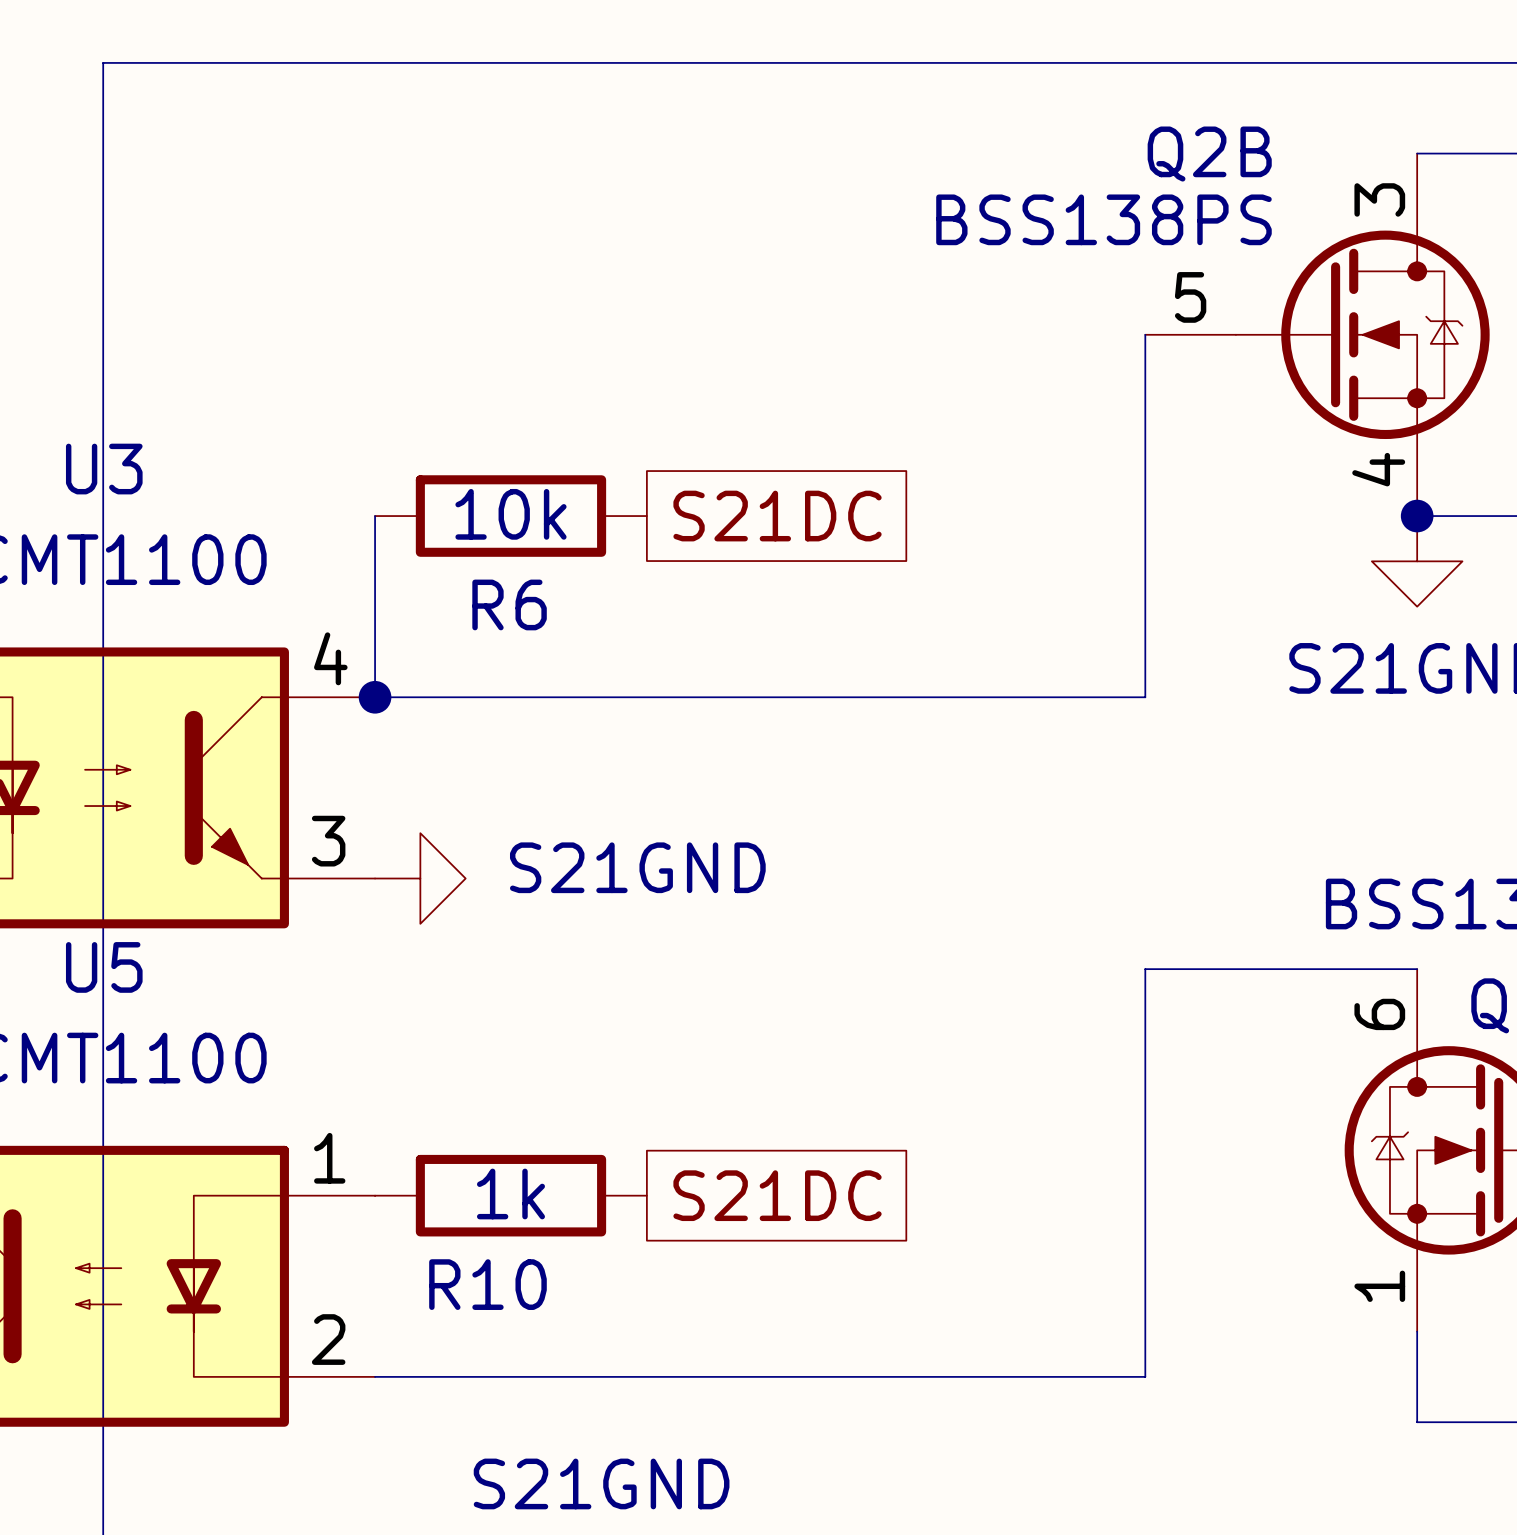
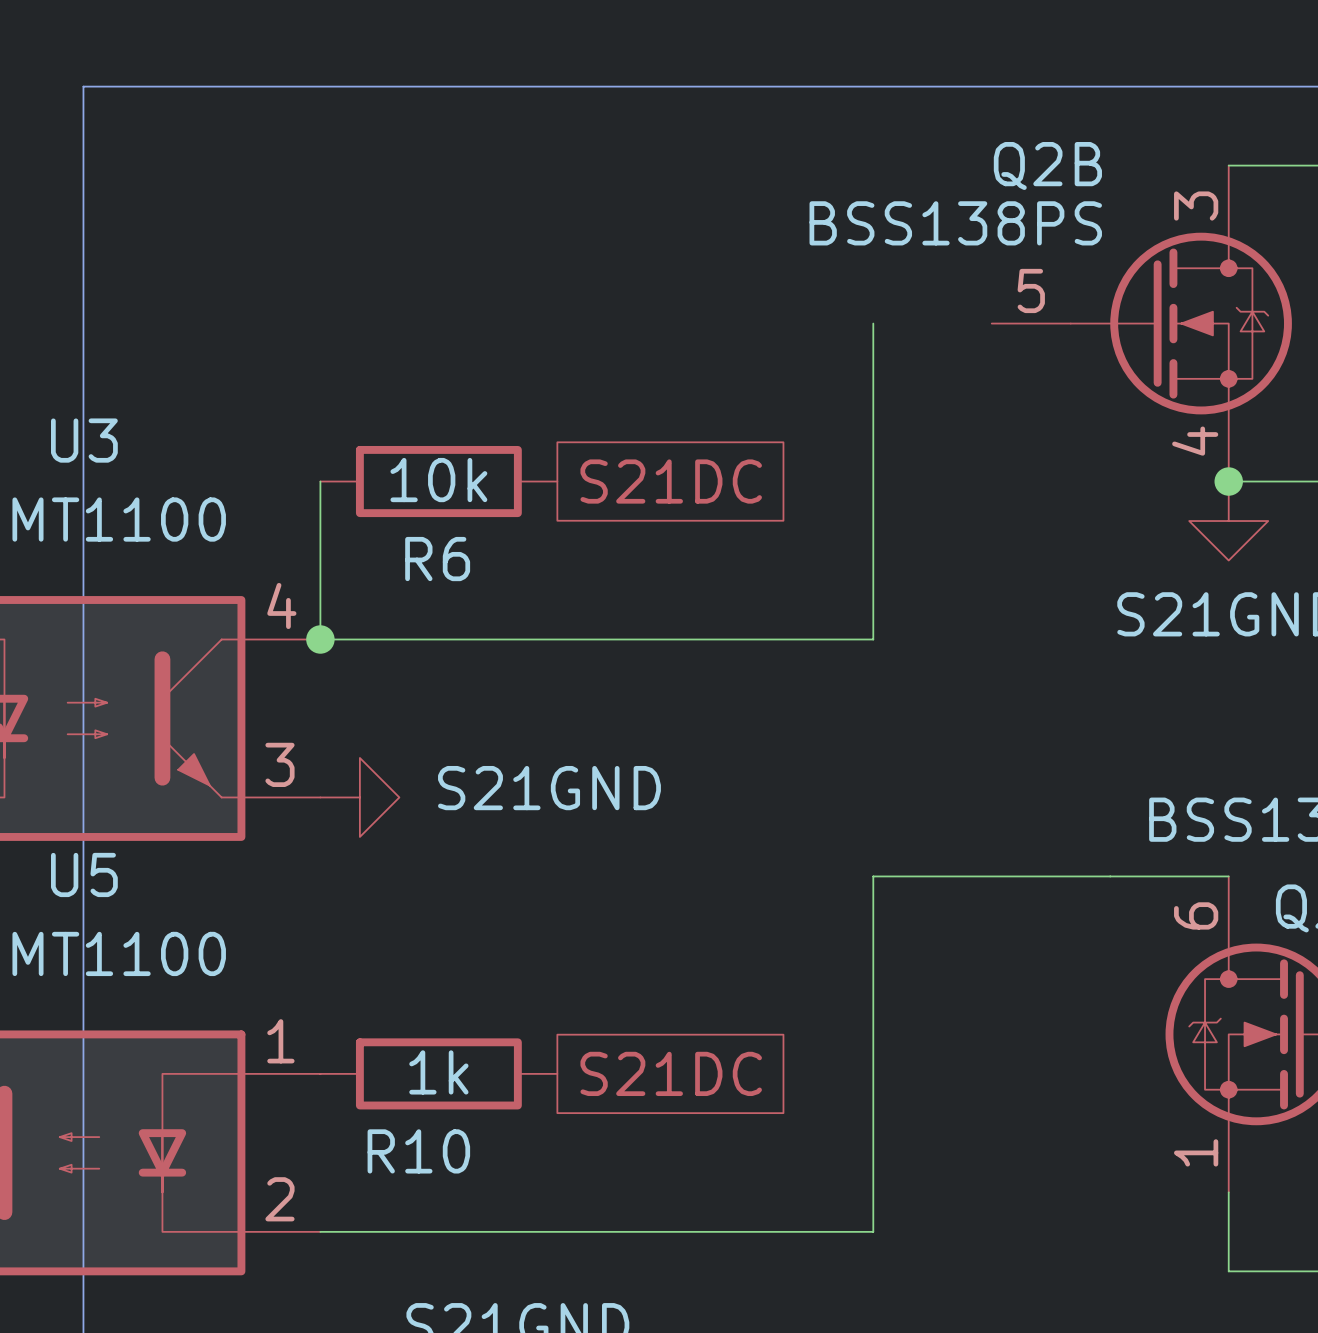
wire: (1145, 334) (1145, 697) (1009, 697) -> (873, 323) (873, 639)
wire: (1145, 969) (1145, 1376) (1009, 1376) -> (991, 876) (873, 876) (873, 1231)

